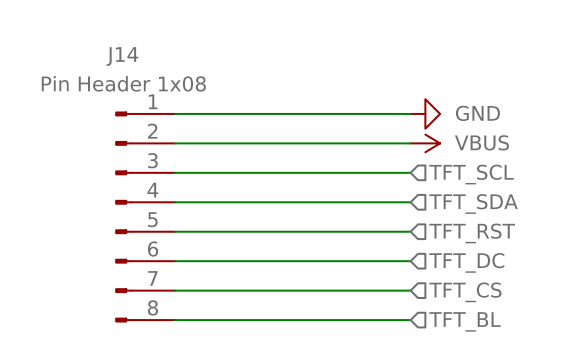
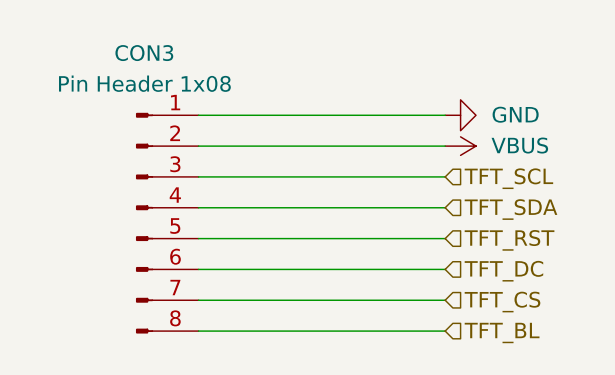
J14 name: J14 (122, 56) -> CON3 (144, 53)

